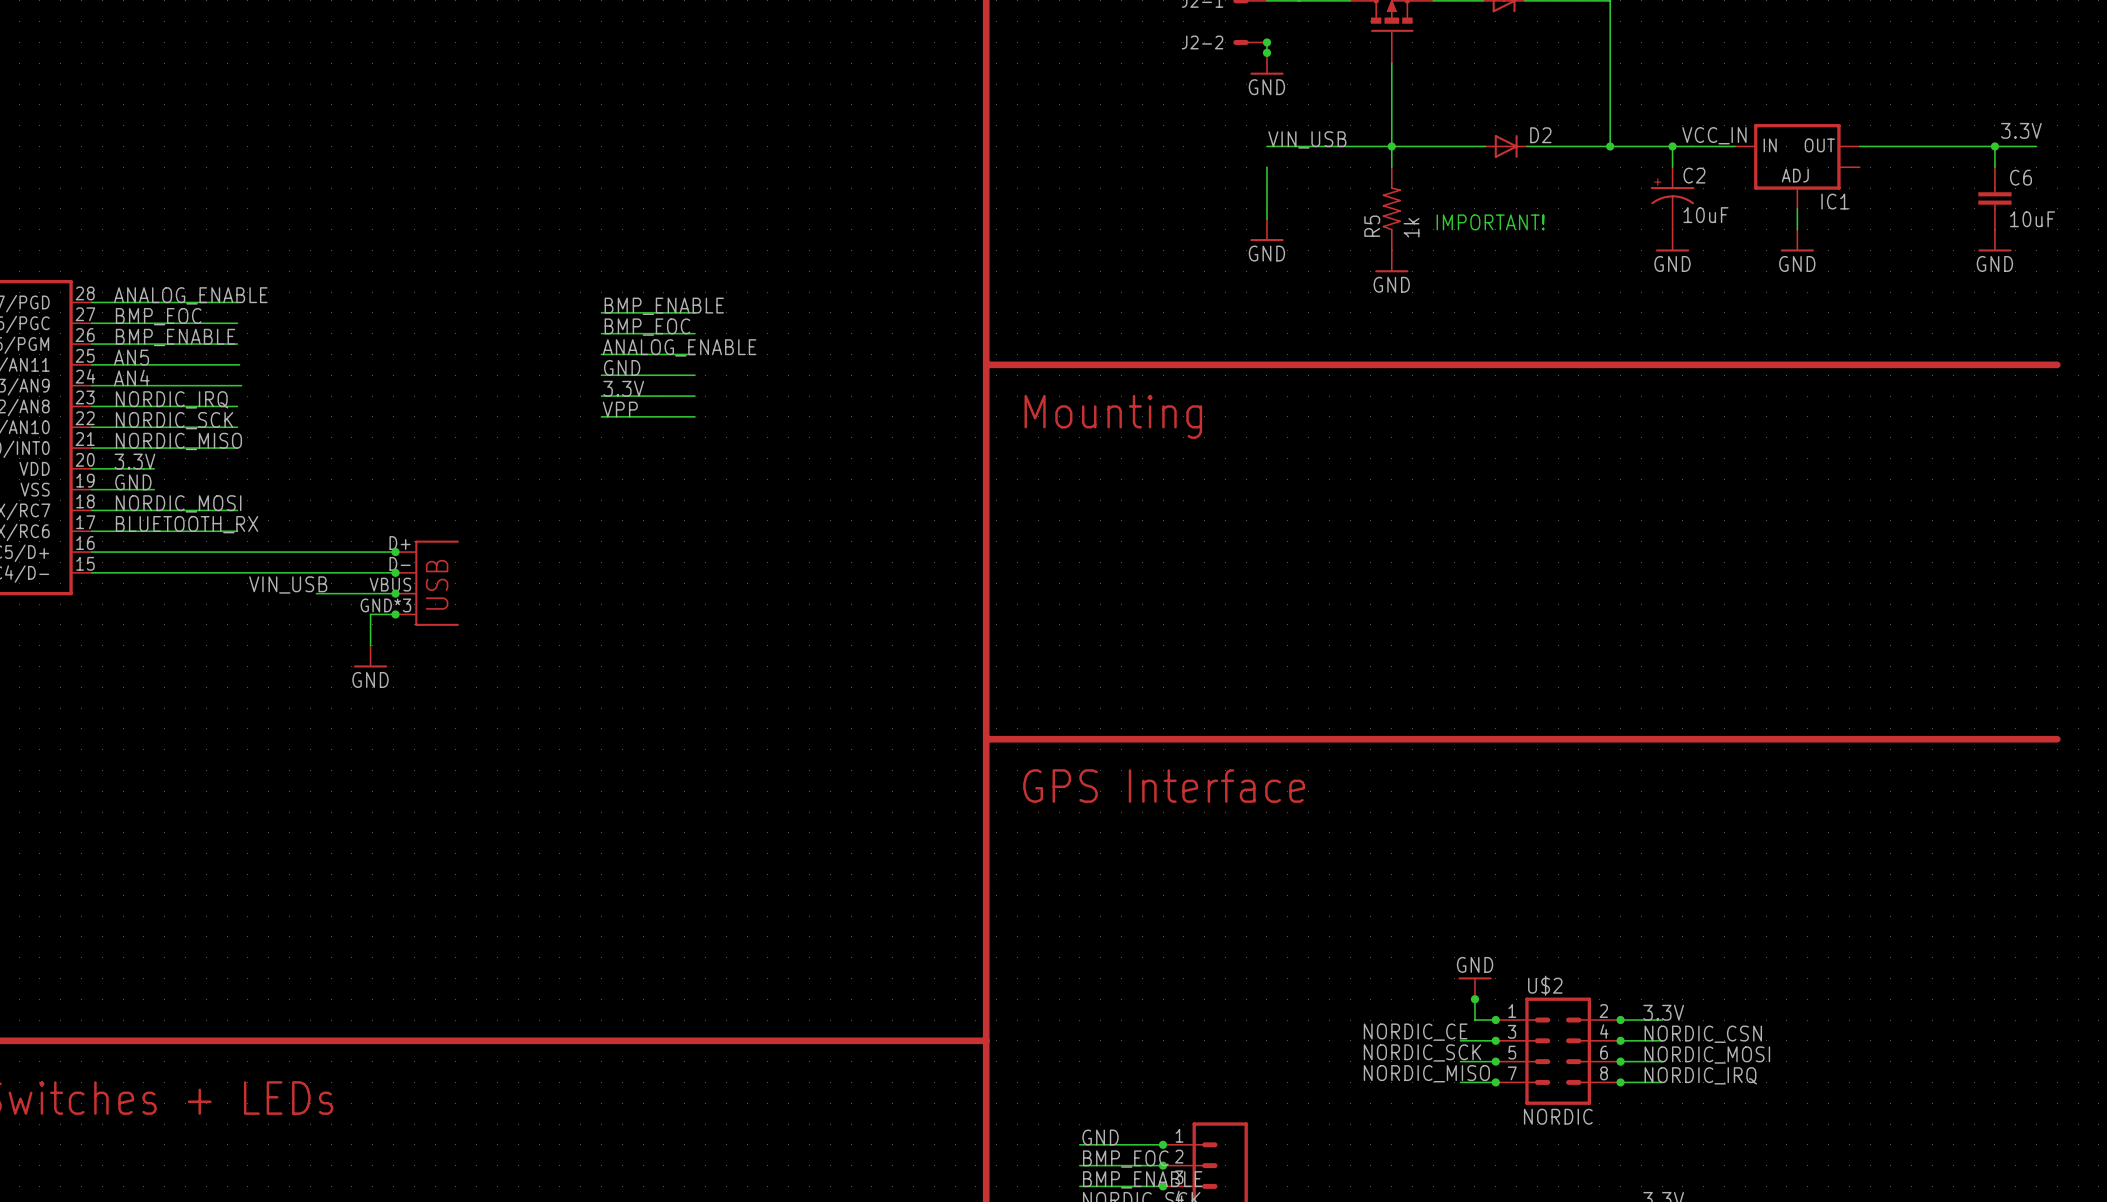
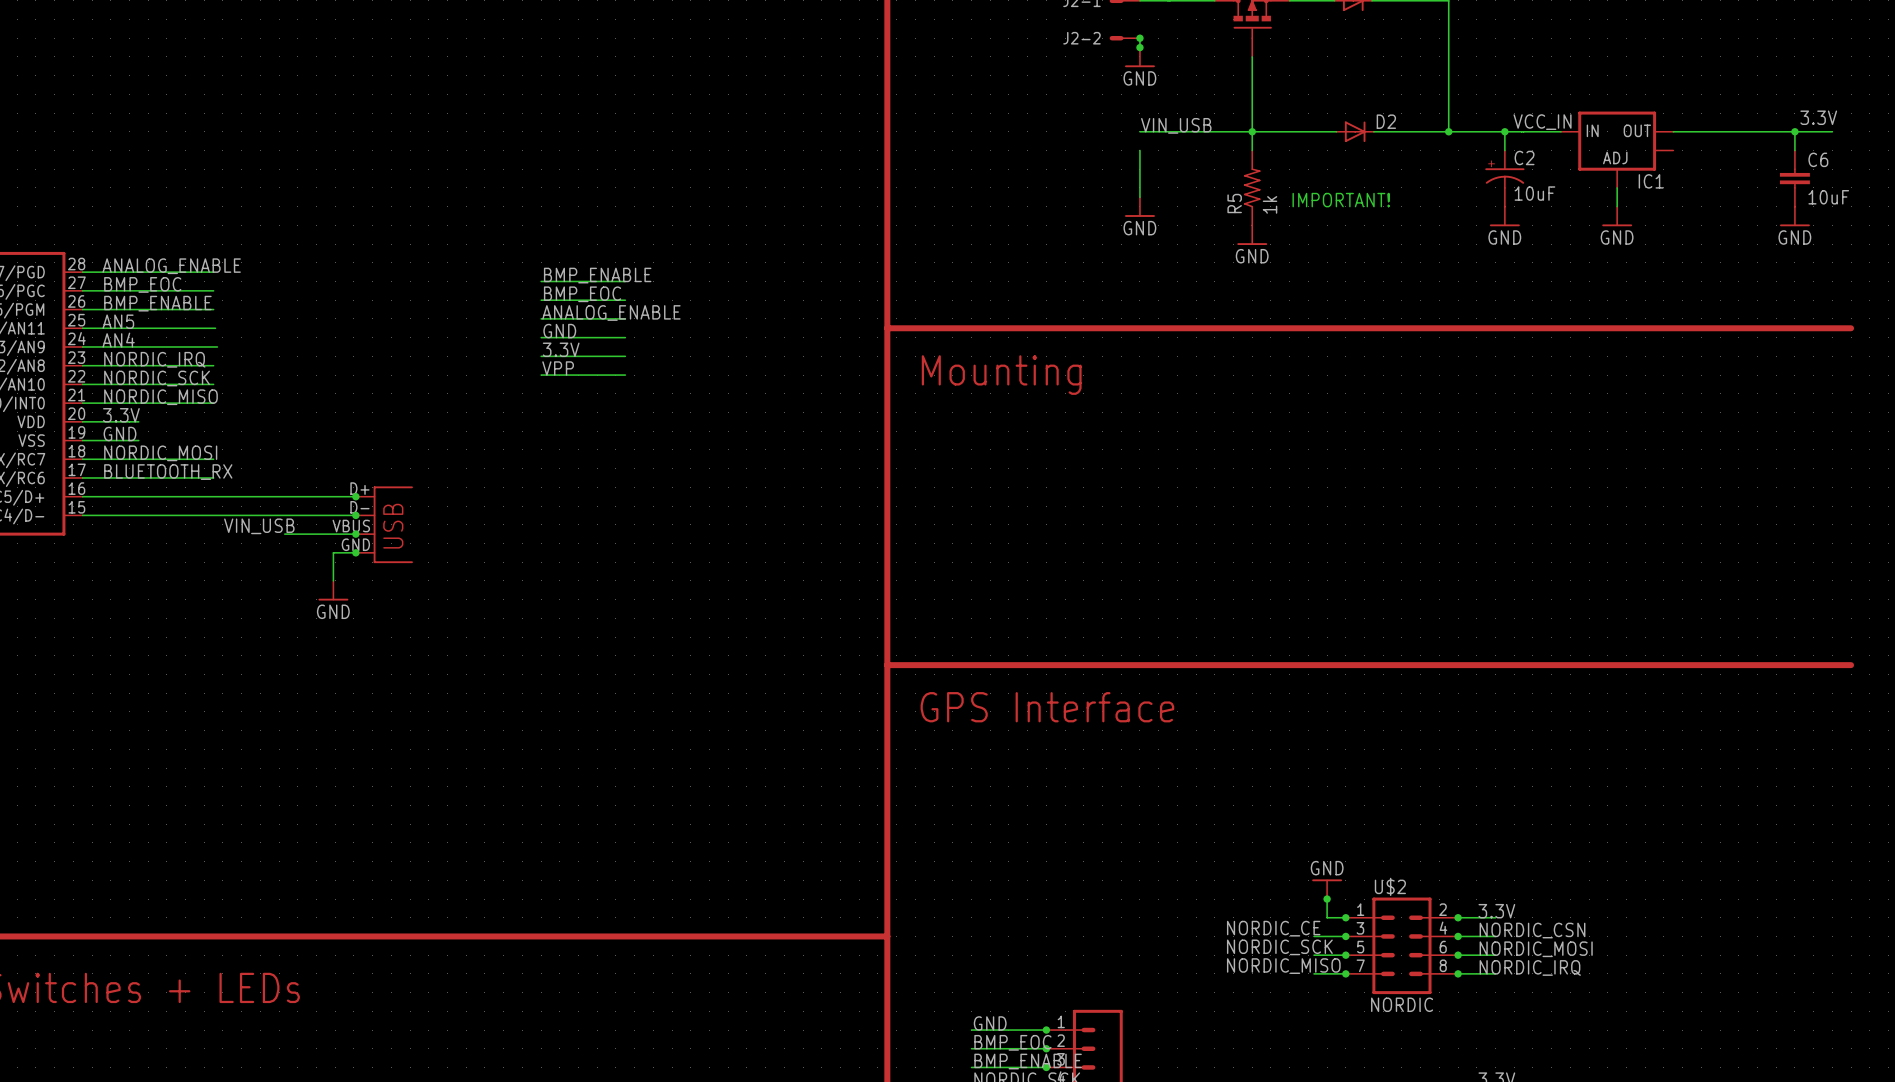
part pin number: GND*3 (385, 605) -> GND (355, 544)

